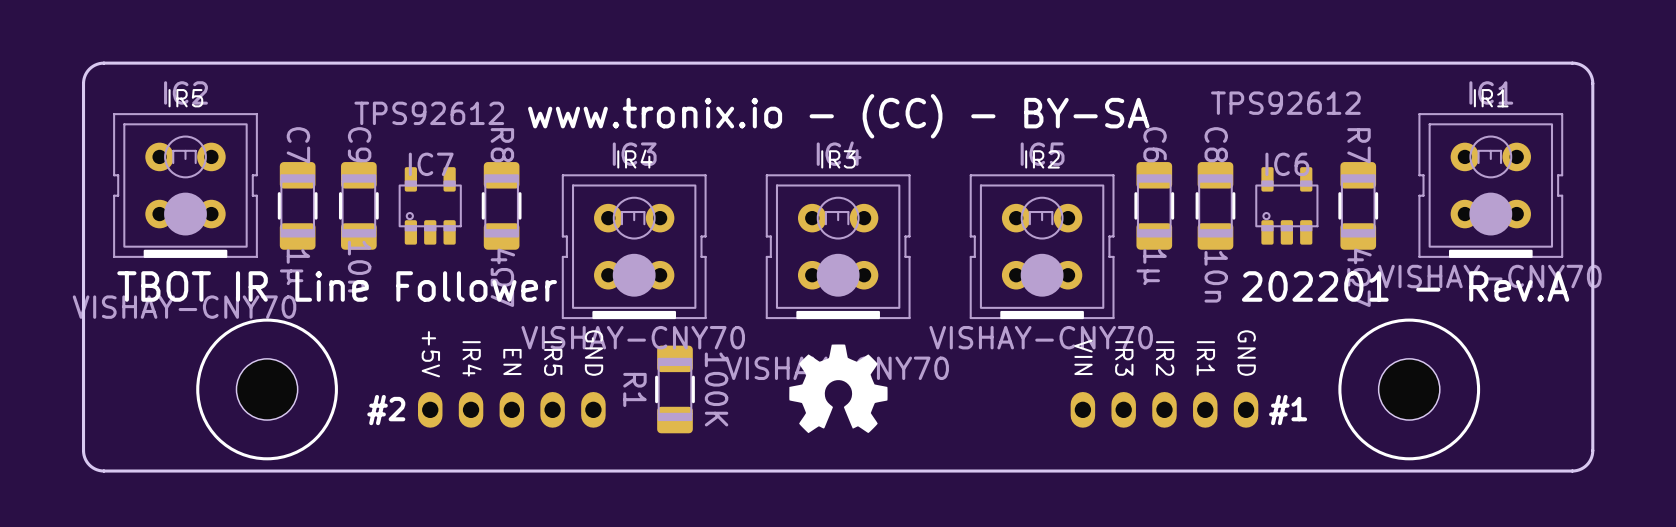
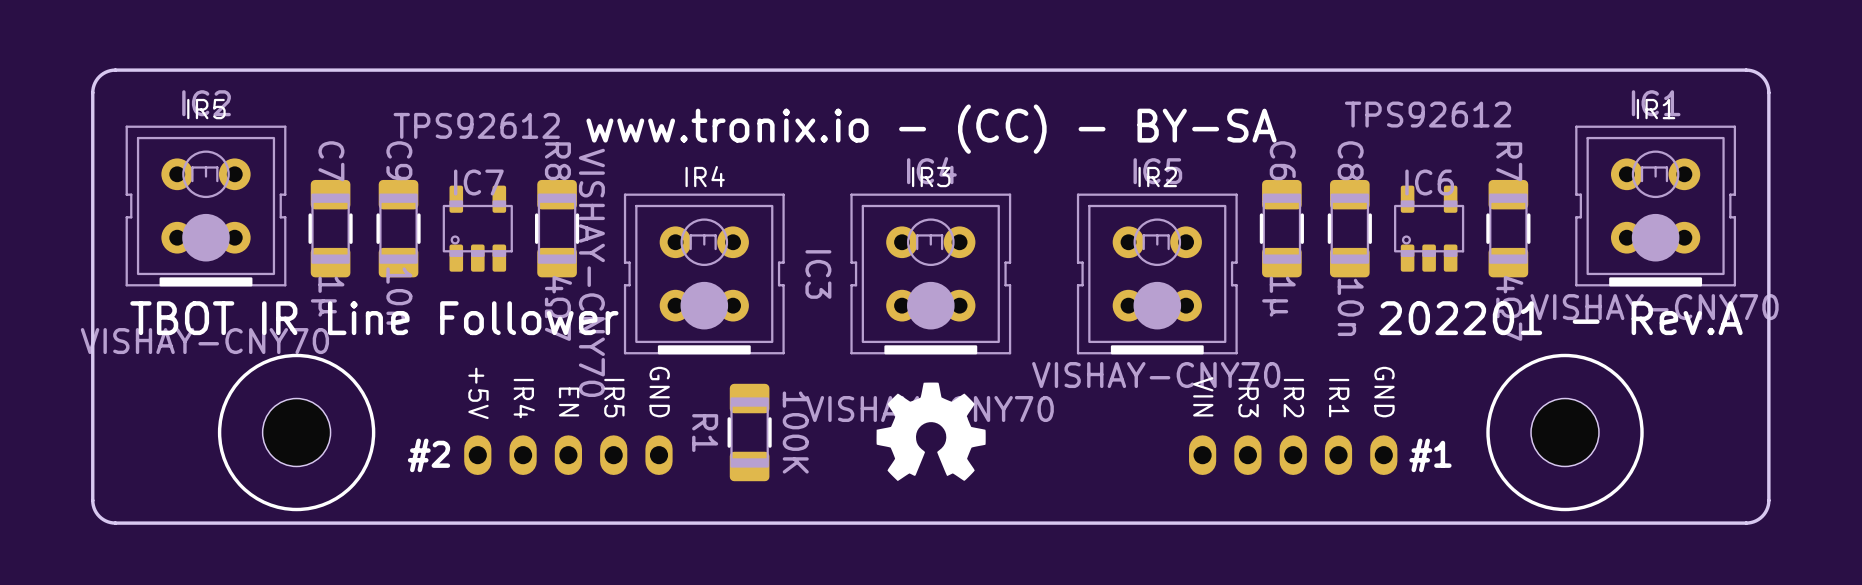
IC3 name rotation: 0° (634, 154) -> 90° clockwise (818, 274)
IC3 name position: IC3 (634, 154) -> IC3 (818, 274)
IC3 value rotation: 0° (633, 337) -> 90° clockwise (591, 272)

